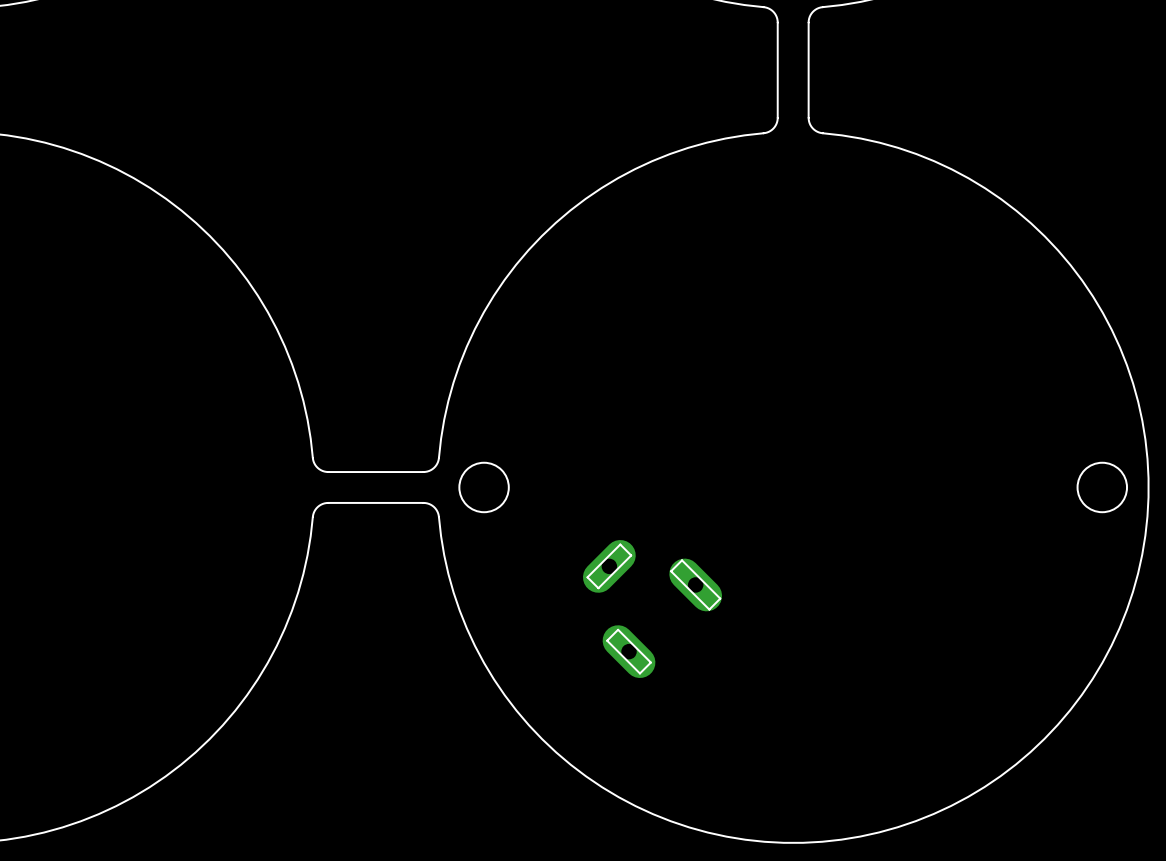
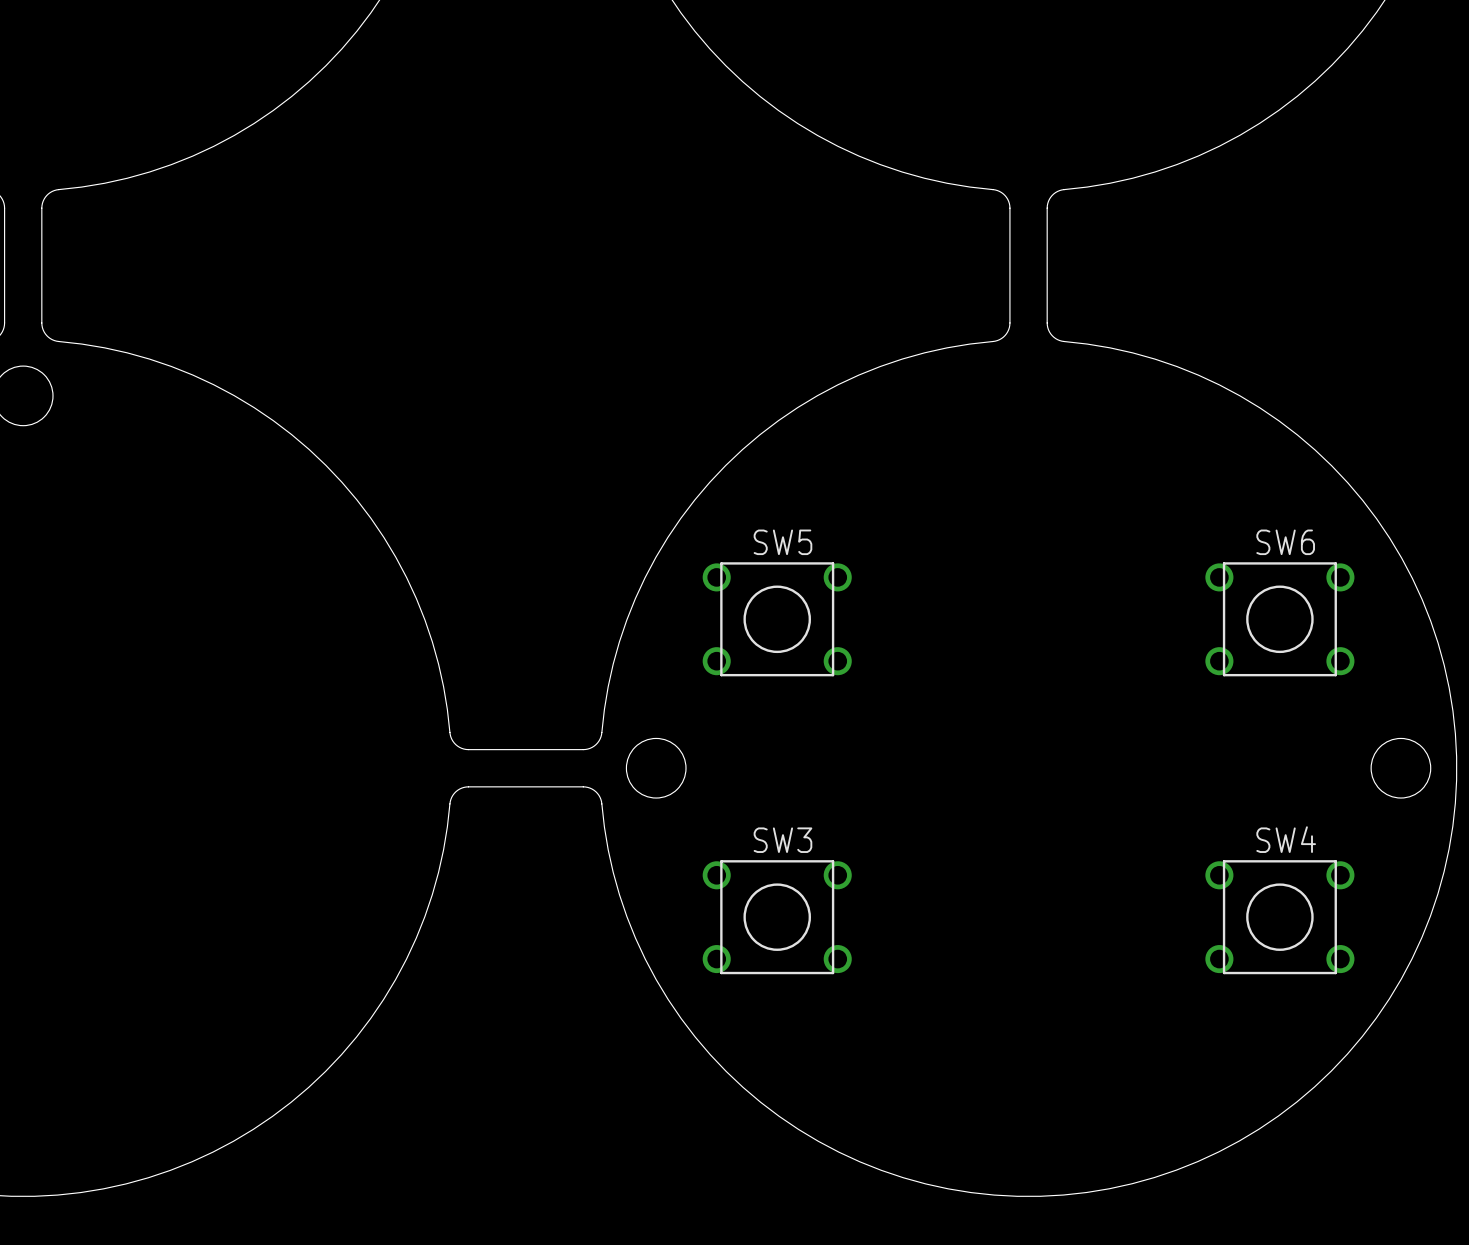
SW5: none -> (777, 619)
SW6: none -> (1279, 619)
part: (652, 609) -> none
SW3: none -> (777, 917)
SW4: none -> (1279, 917)

